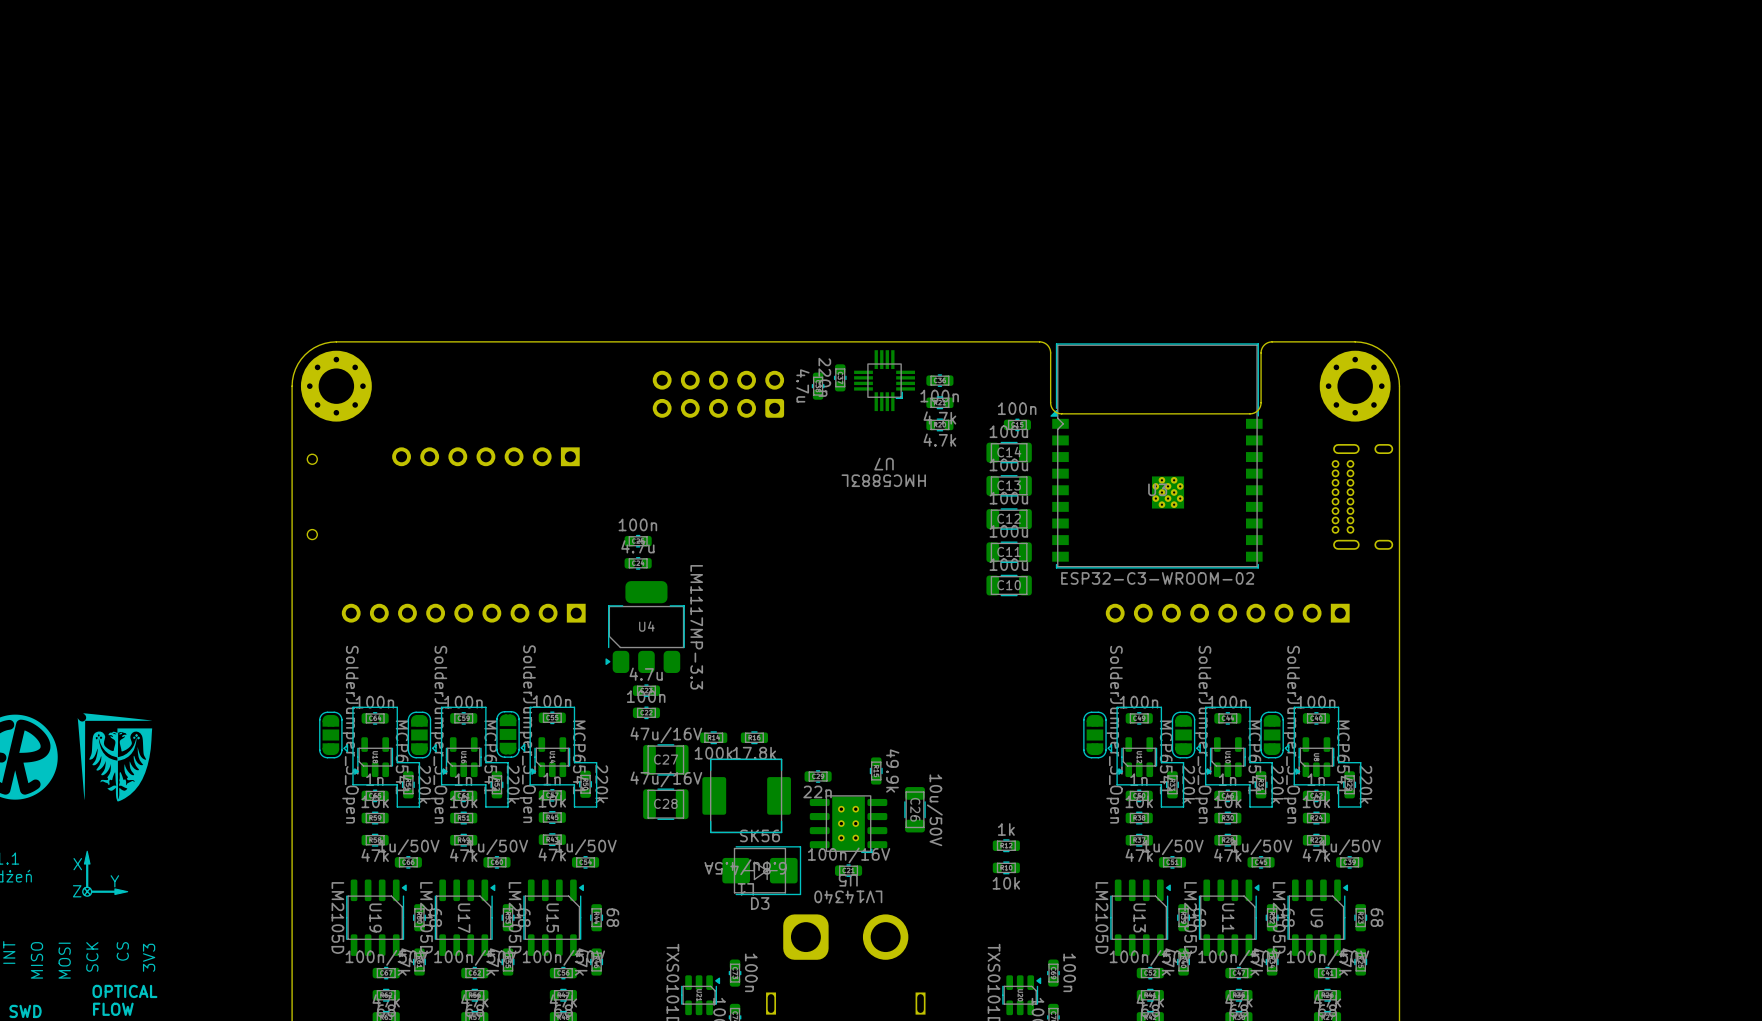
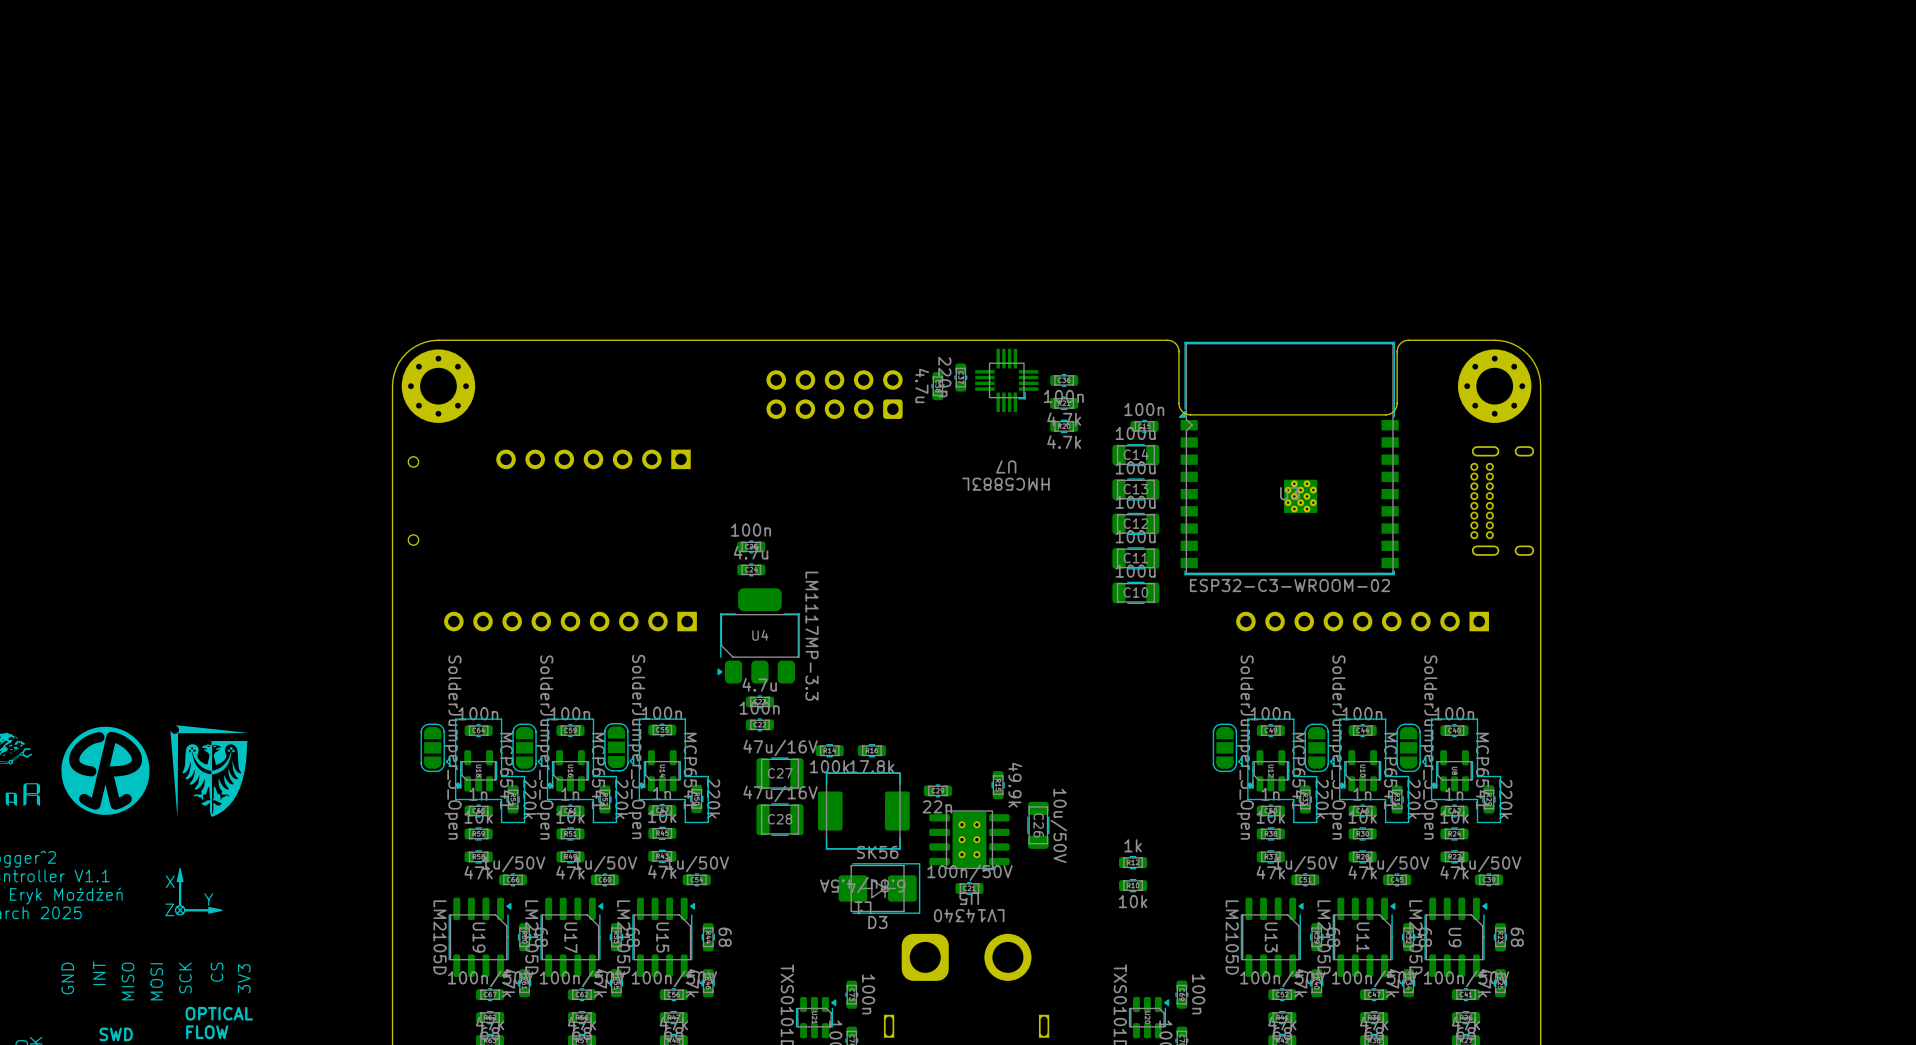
part value: 100n/16V (849, 855) -> 100n/50V (970, 872)

